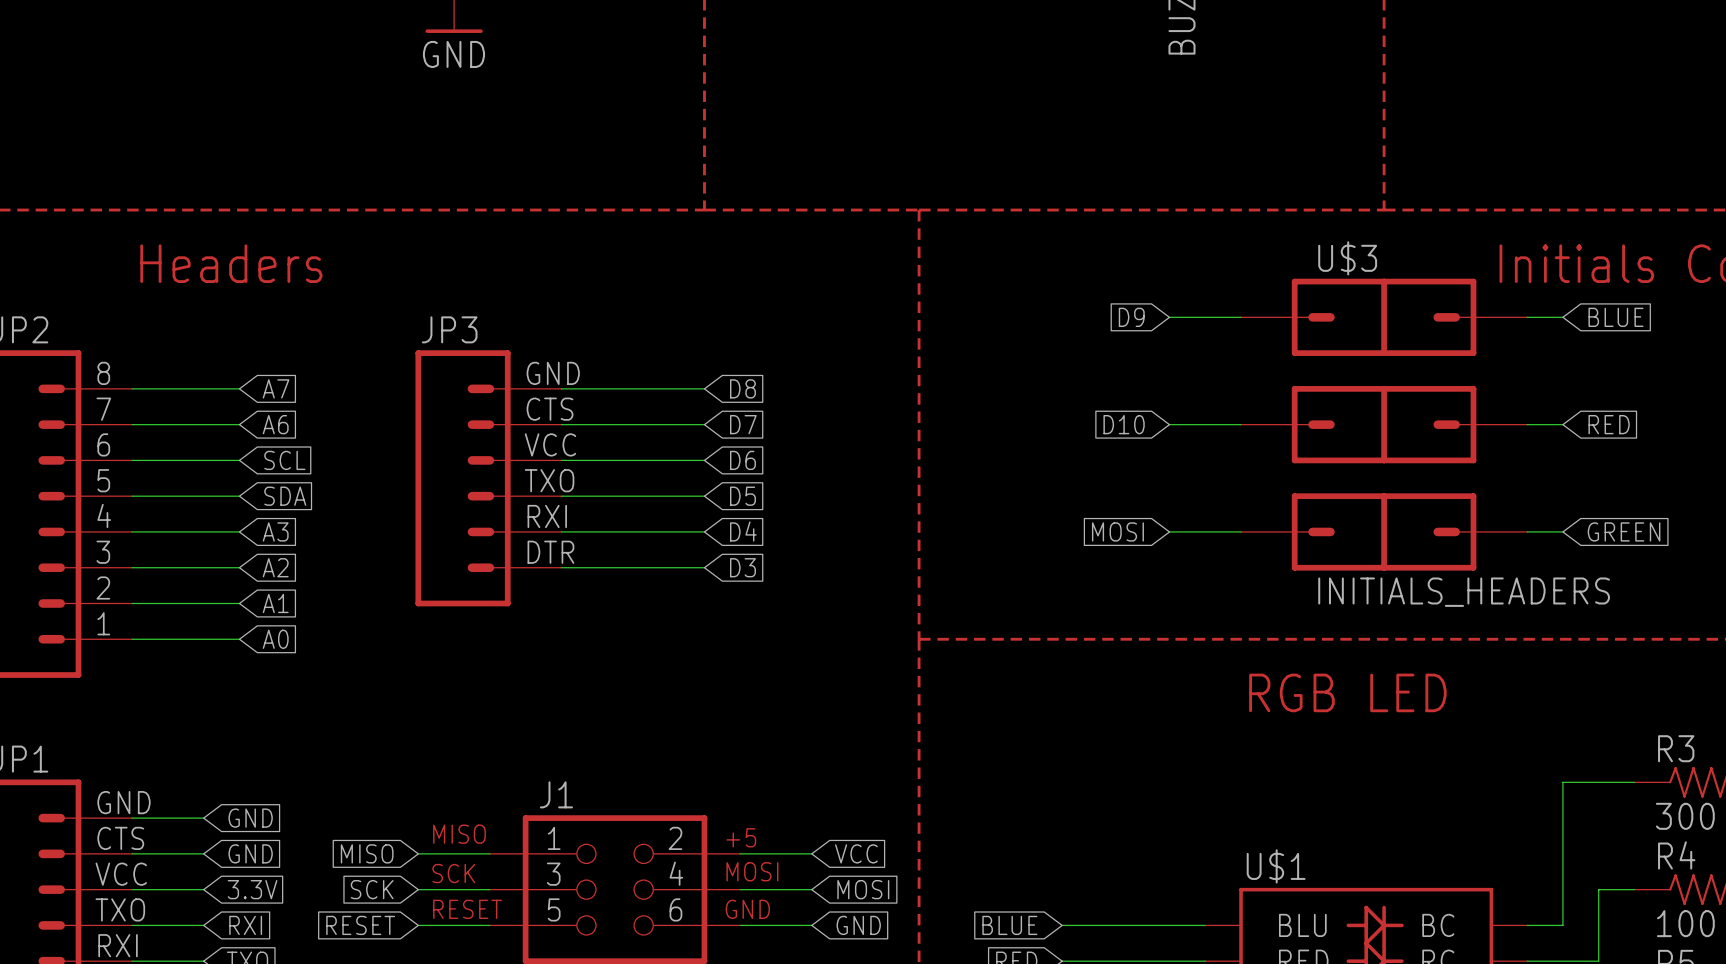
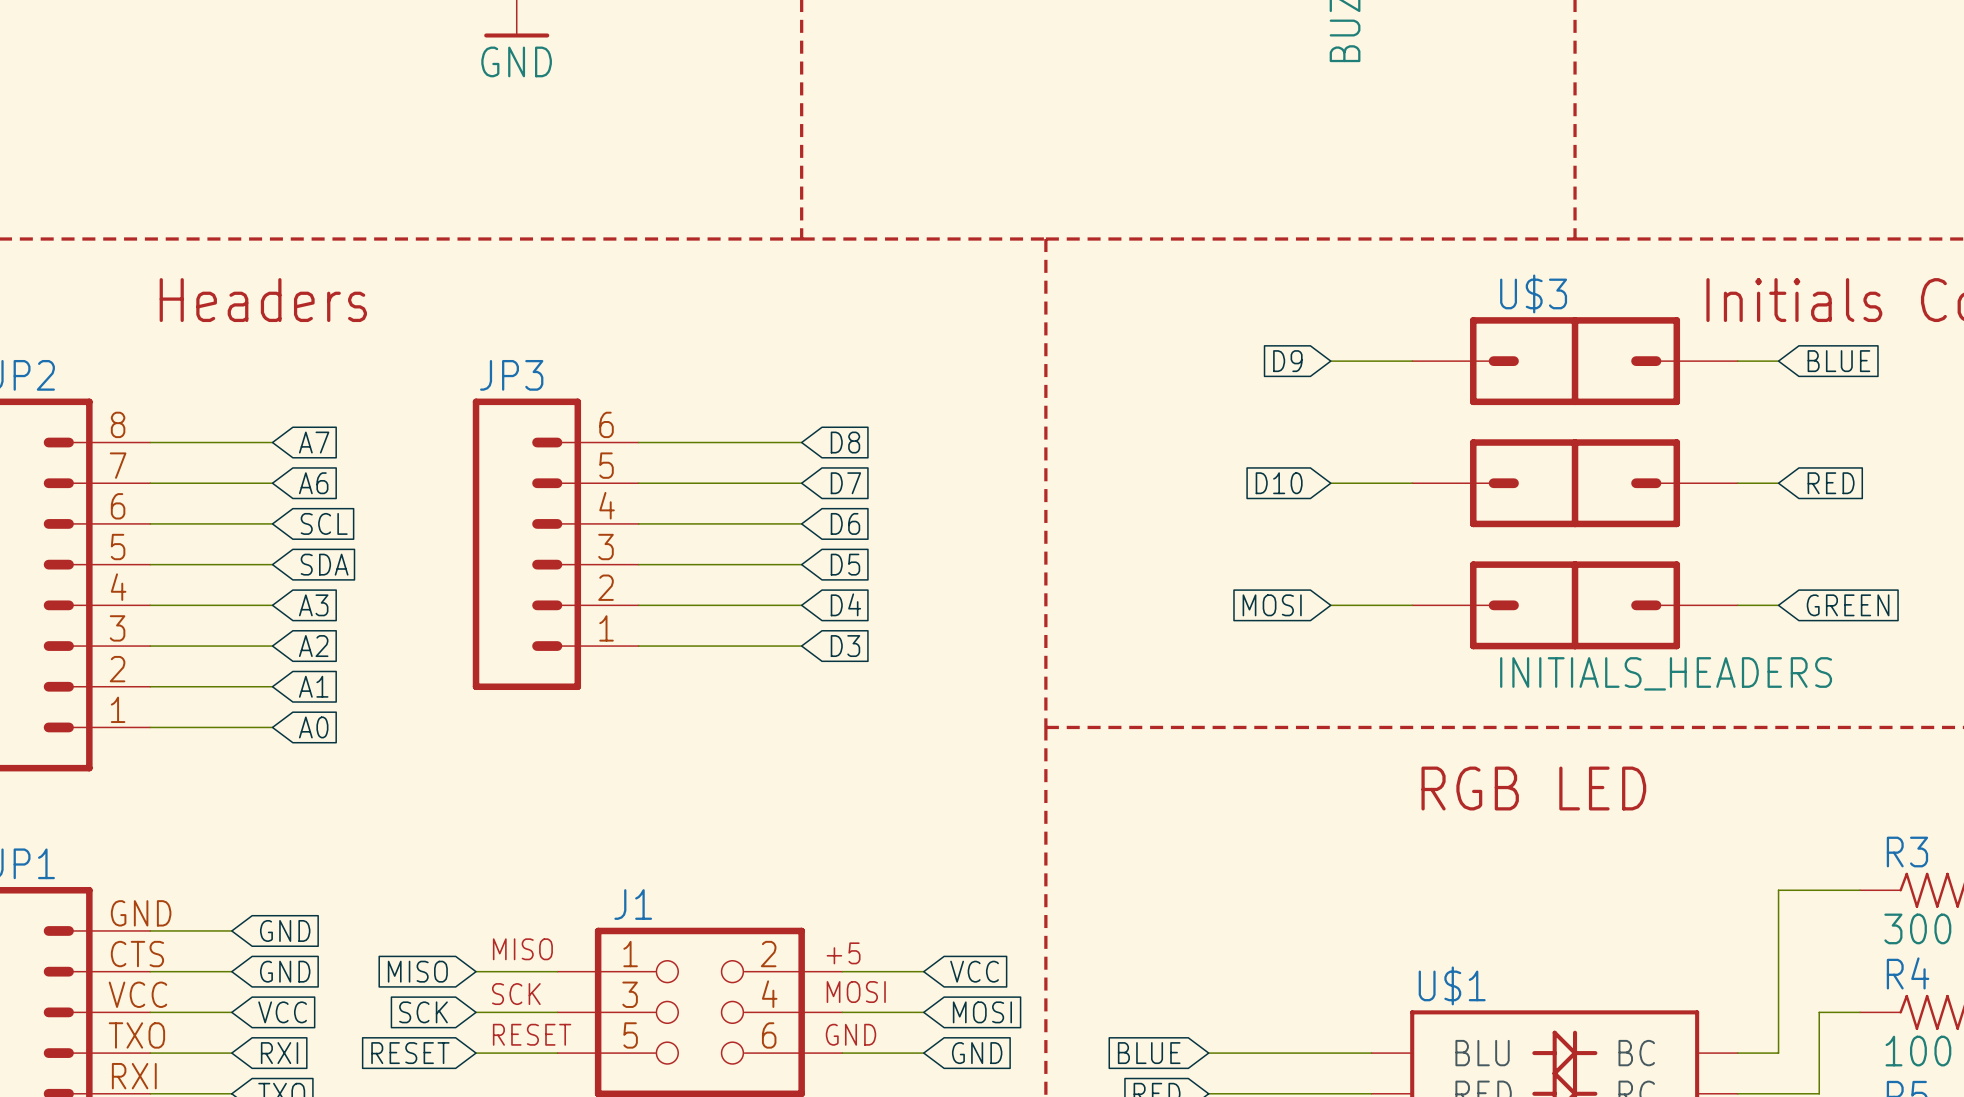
JP3 pin number: GND (553, 373) -> 6 (606, 424)
JP3 pin number: CTS (550, 409) -> 5 (606, 465)
JP3 pin number: VCC (550, 444) -> 4 (607, 505)
JP3 pin number: TXO (549, 480) -> 3 (606, 547)
JP3 pin number: RXI (547, 516) -> 2 (606, 587)
JP3 pin number: DTR (550, 552) -> 1 (606, 628)
global label: 3.3V (252, 889) -> VCC (282, 1012)

